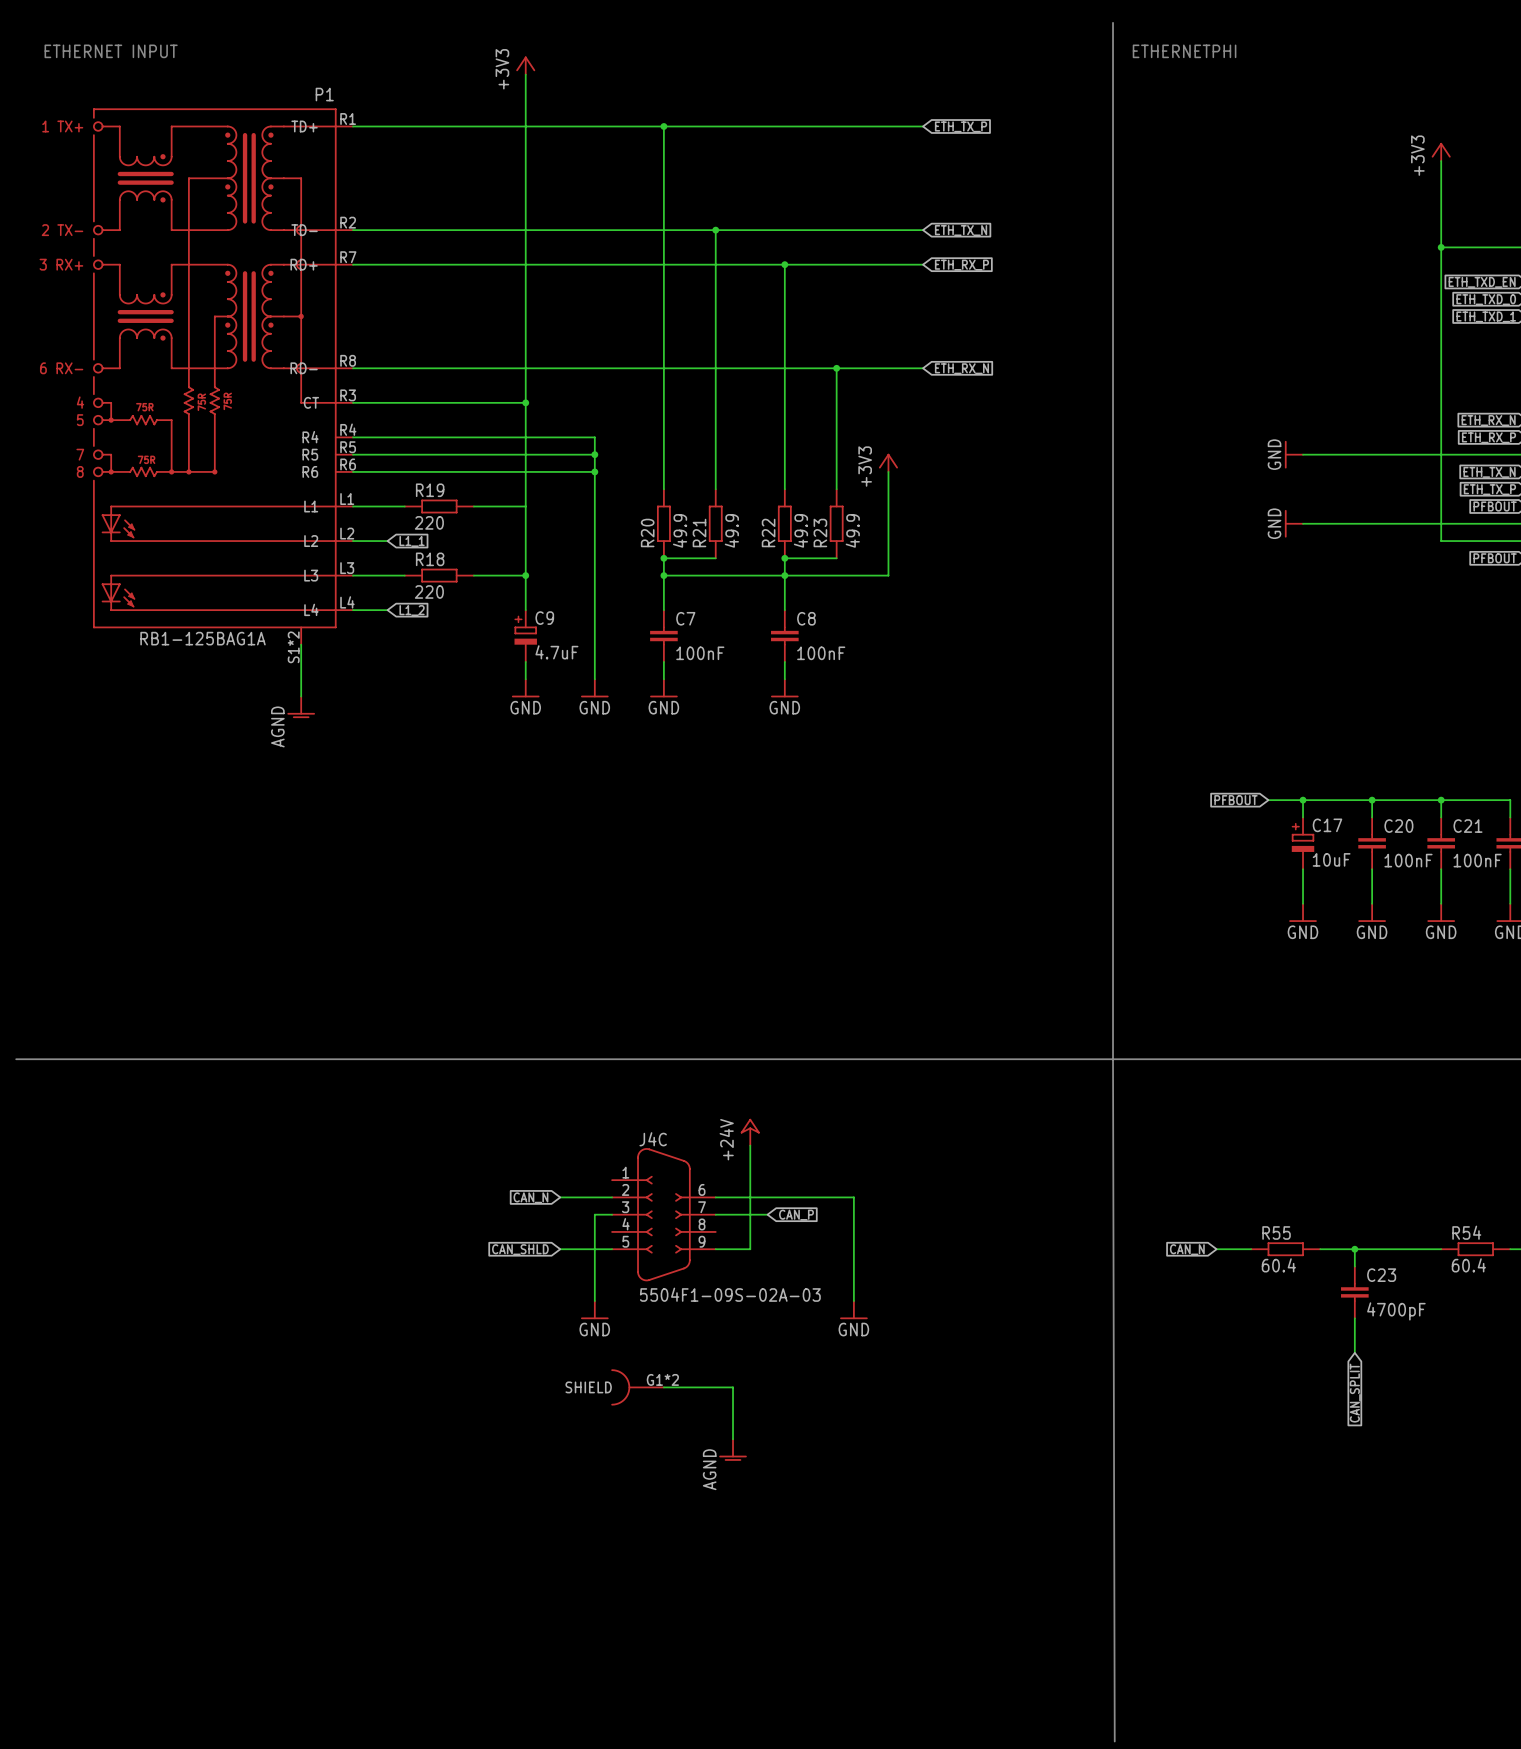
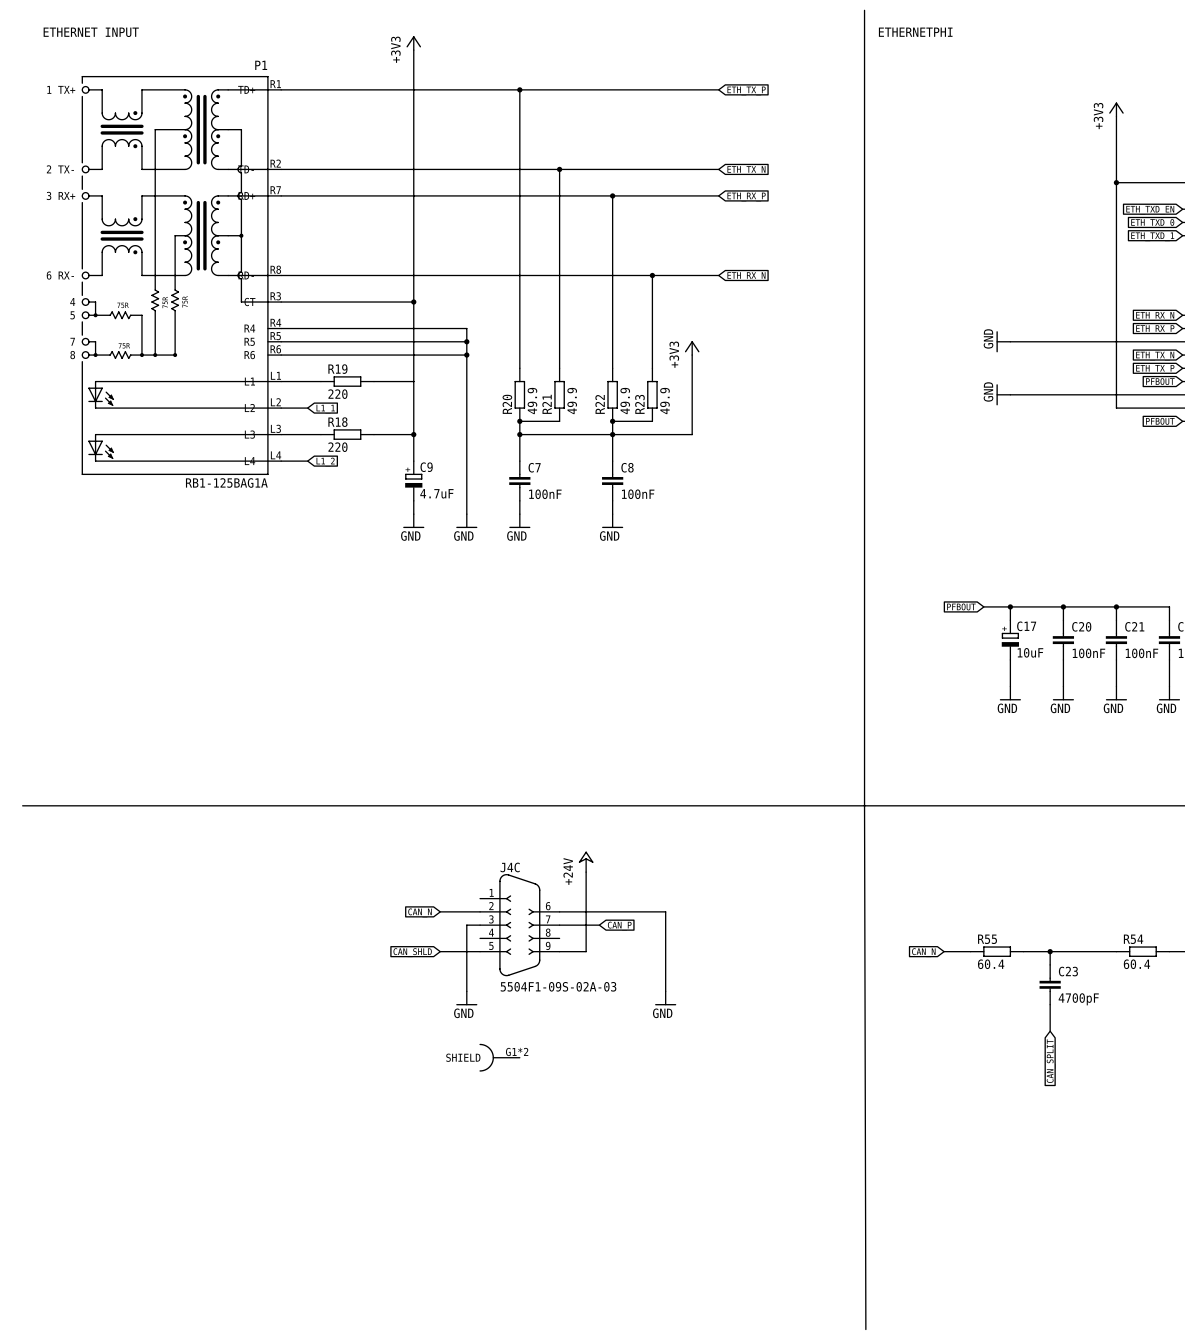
P1 symbol: [93, 108, 354, 645] -> [81, 75, 282, 476]
P1 value position: RB1-125BAG1A (203, 638) -> RB1-125BAG1A (226, 482)
wire: (301, 644) (301, 696) -> none
power symbol: AGND (301, 707) -> none
wire: (663, 1387) (733, 1387) (733, 1439) -> none
power symbol: AGND (733, 1450) -> none

